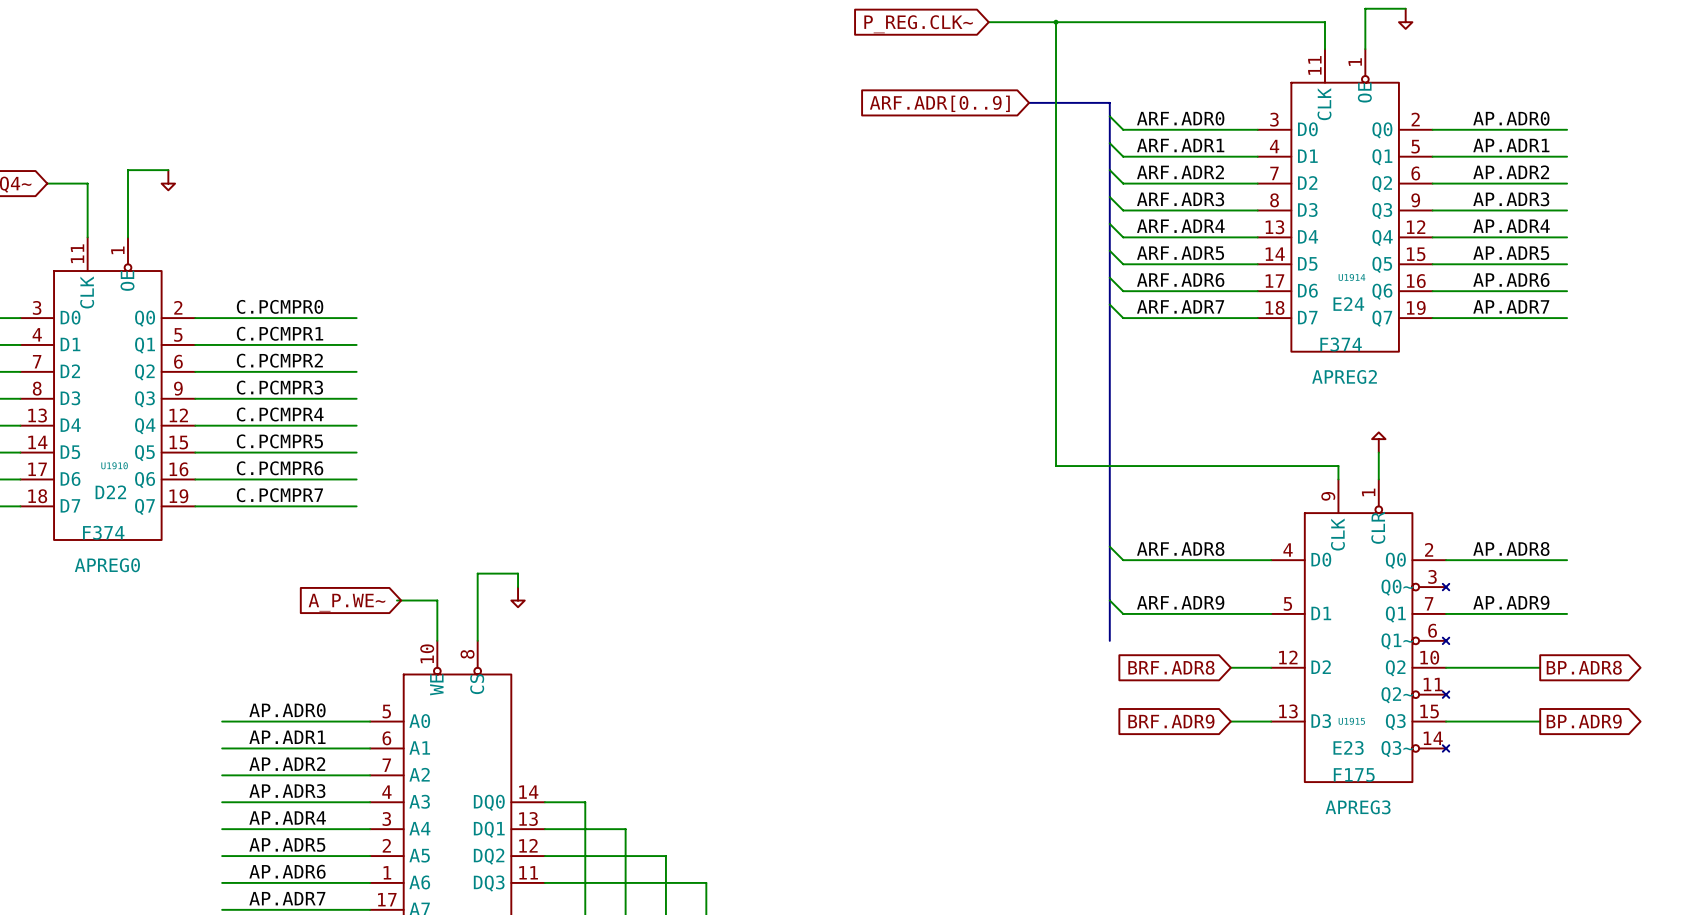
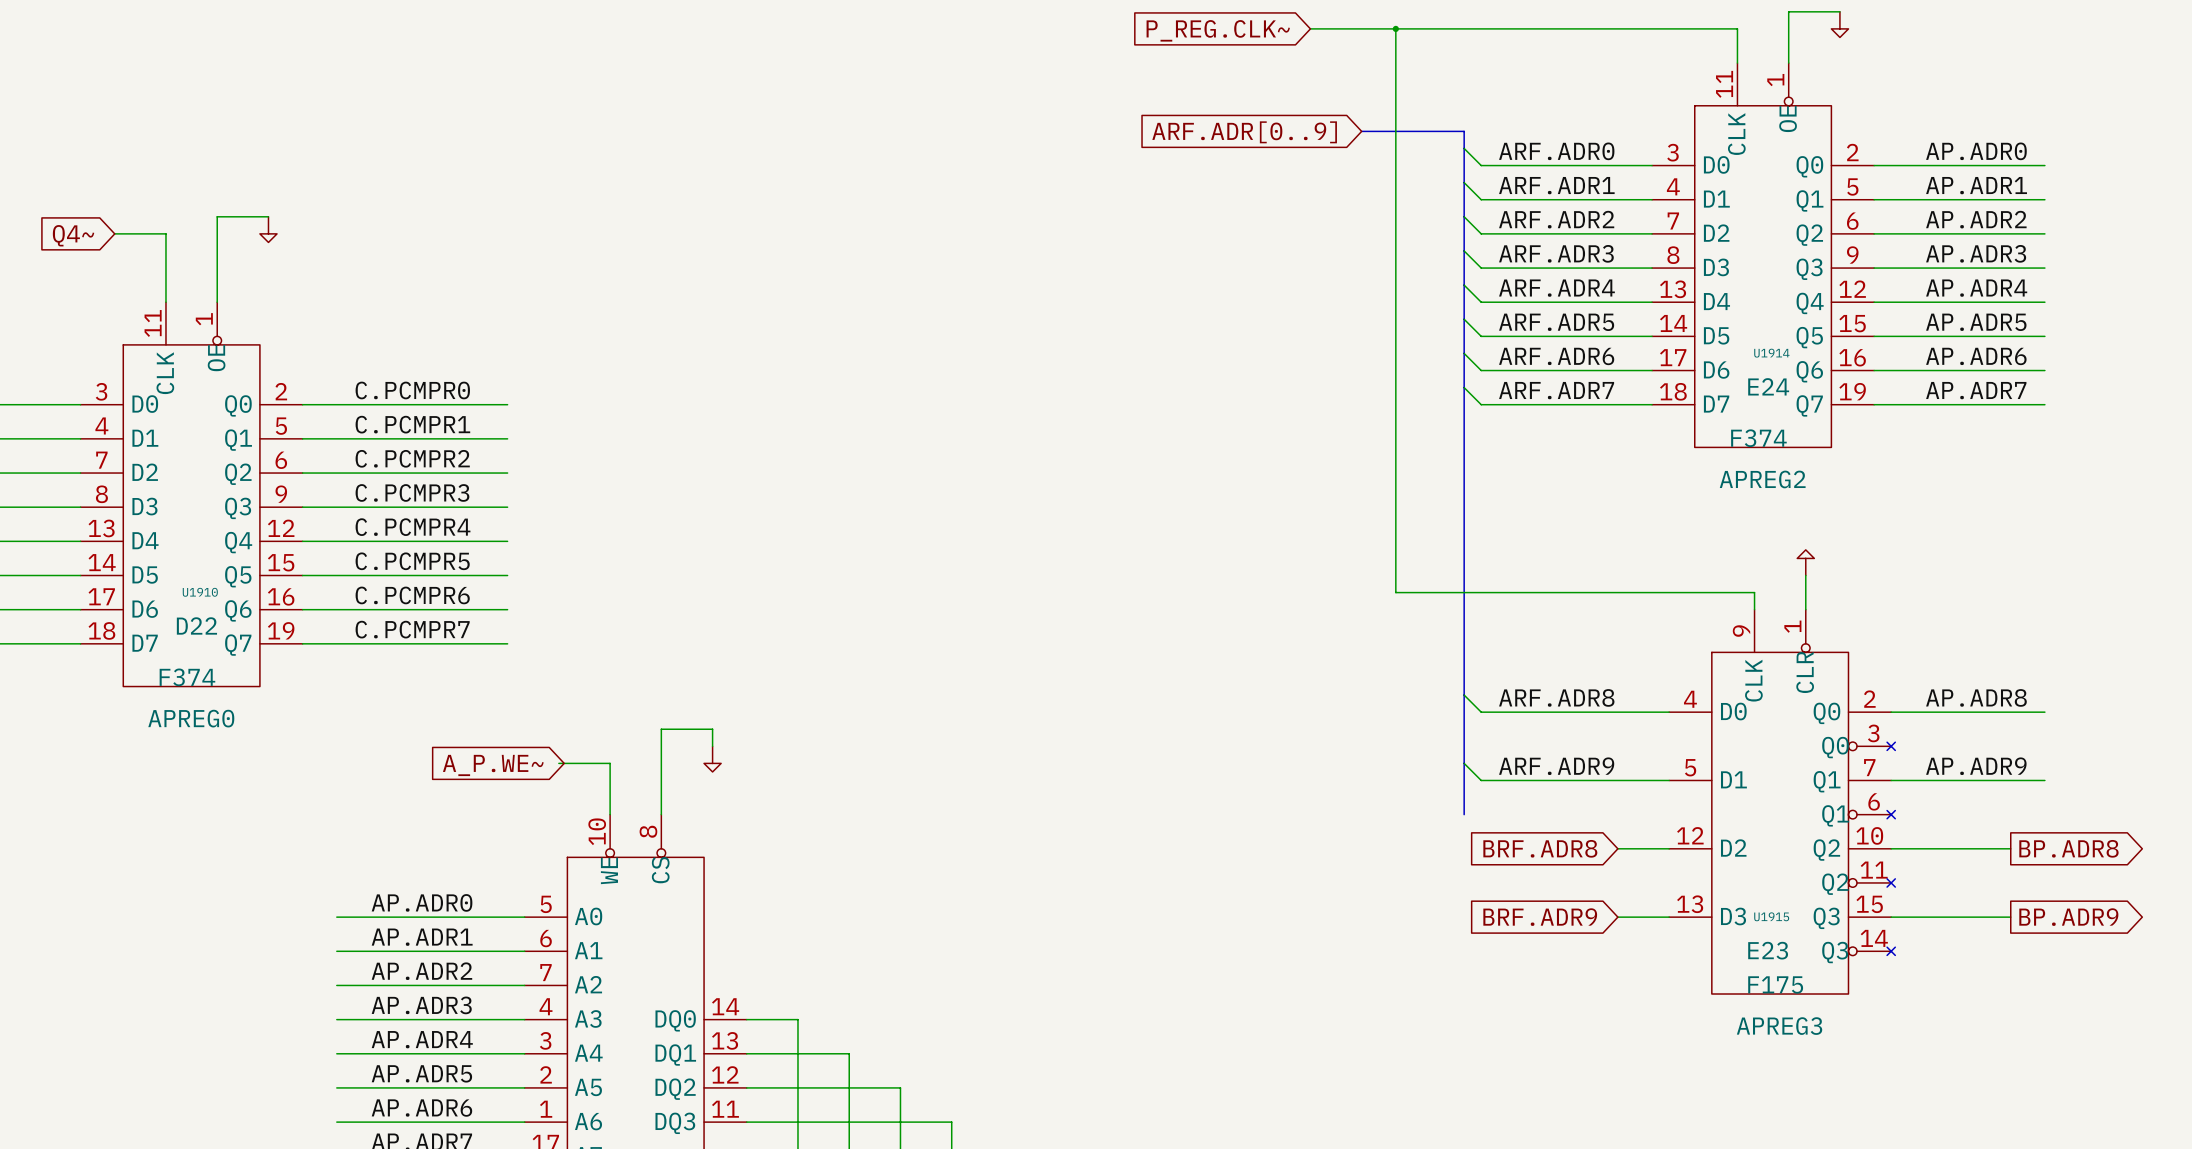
U1915 pin name: Q0~ (1397, 587) -> Q0 (1835, 747)
U1915 pin name: Q1~ (1397, 641) -> Q1 (1835, 815)
U1915 pin name: Q2~ (1397, 695) -> Q2 (1835, 884)
U1915 pin name: Q3~ (1397, 749) -> Q3 (1835, 952)

